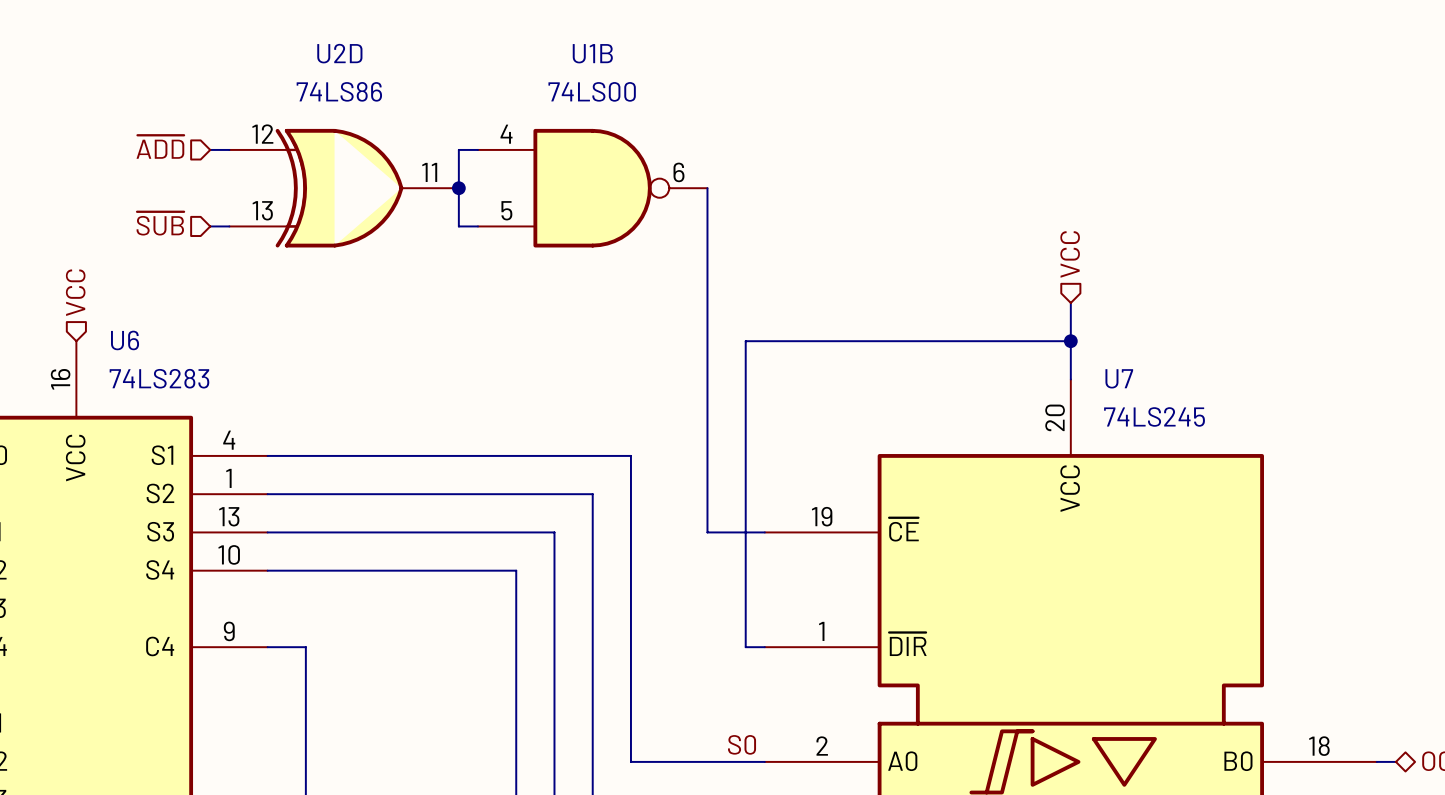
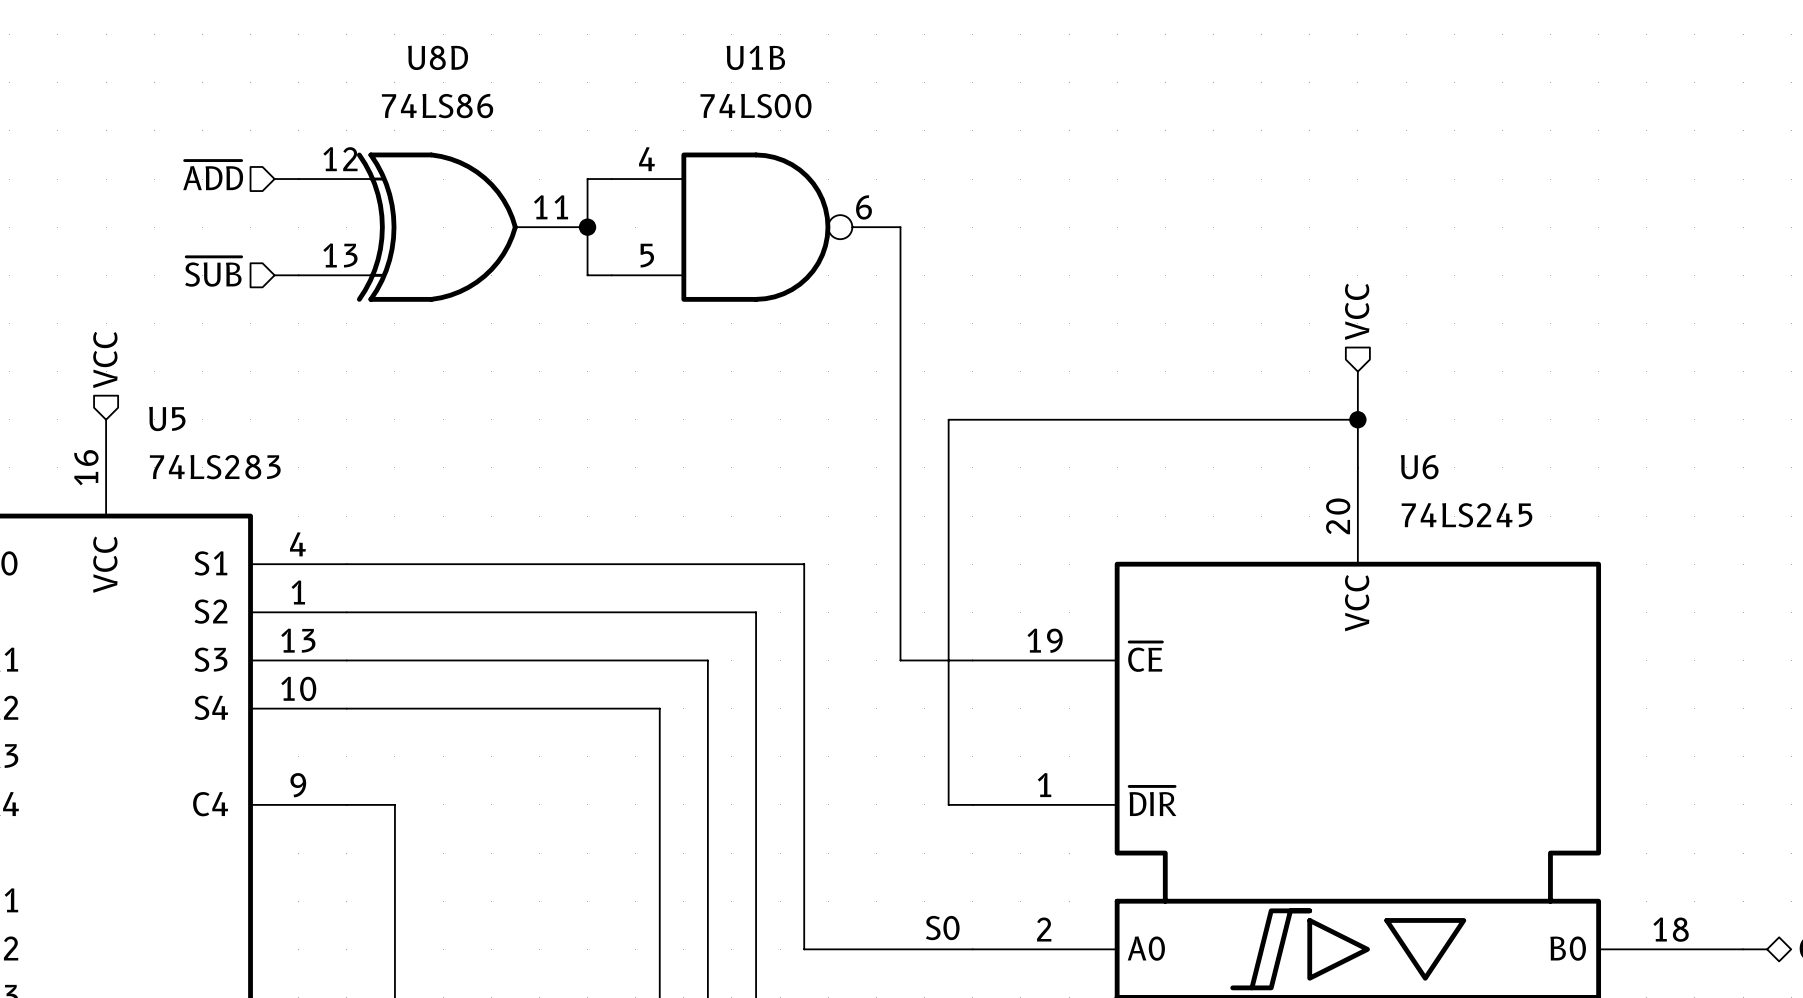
U2D name: U2D (339, 53) -> U8D (438, 57)
U6 name: U6 (125, 340) -> U5 (167, 418)
U7 name: U7 (1119, 378) -> U6 (1419, 467)

